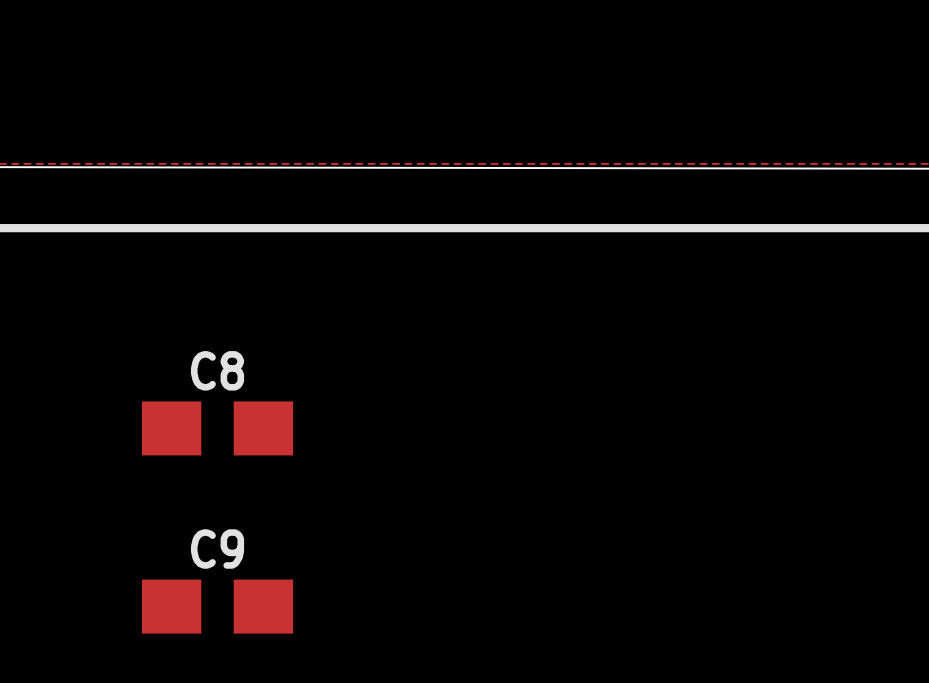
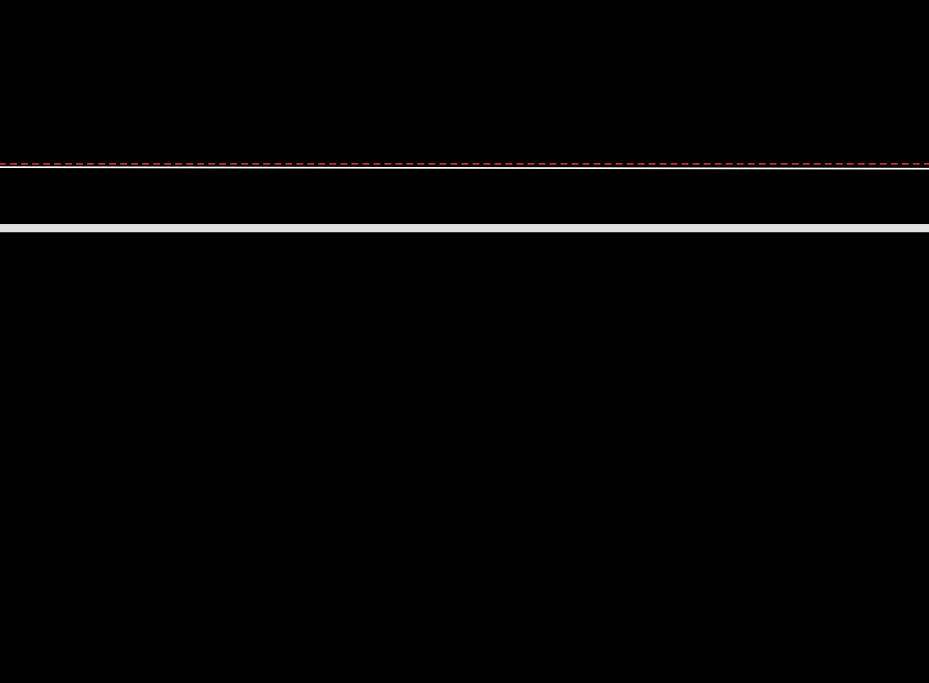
C8: (217, 428) -> none
C9: (217, 606) -> none

